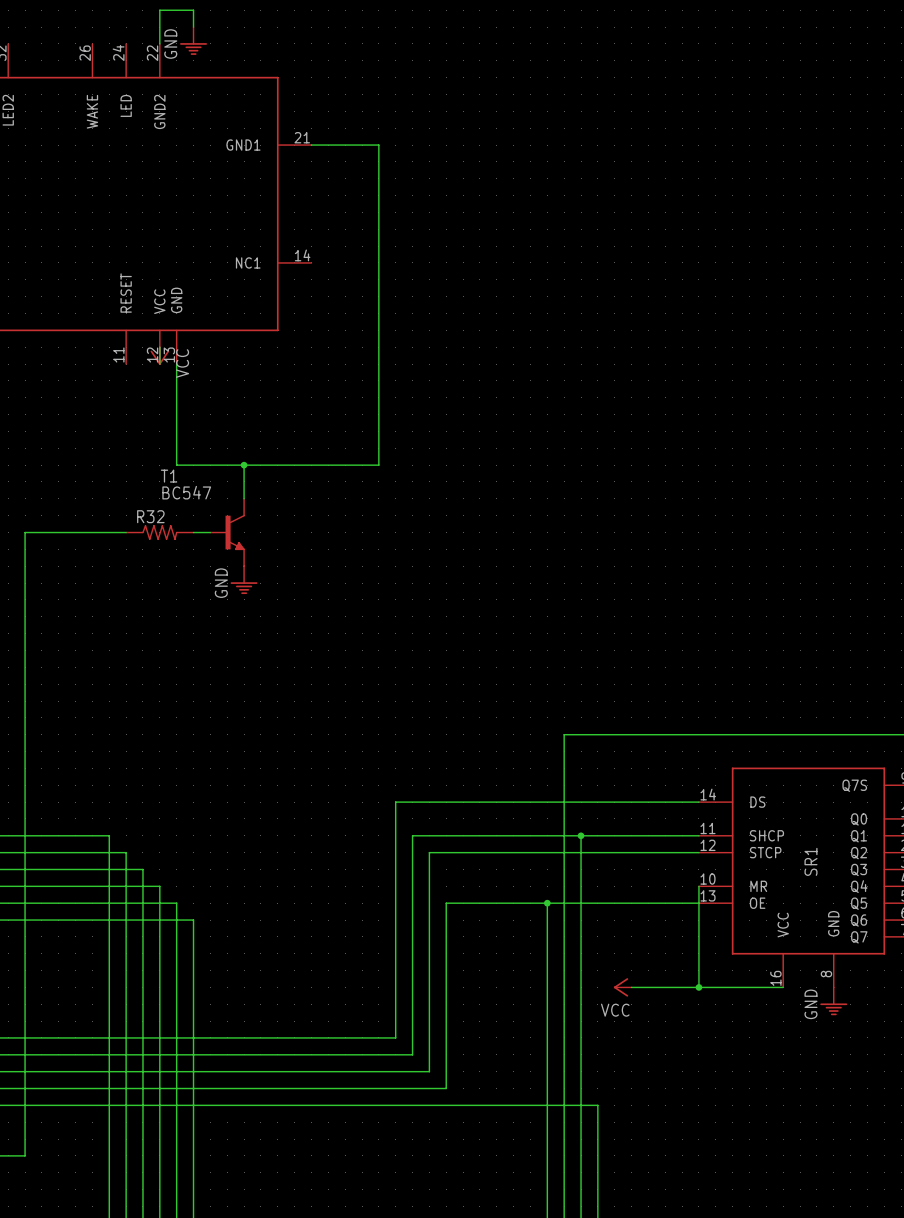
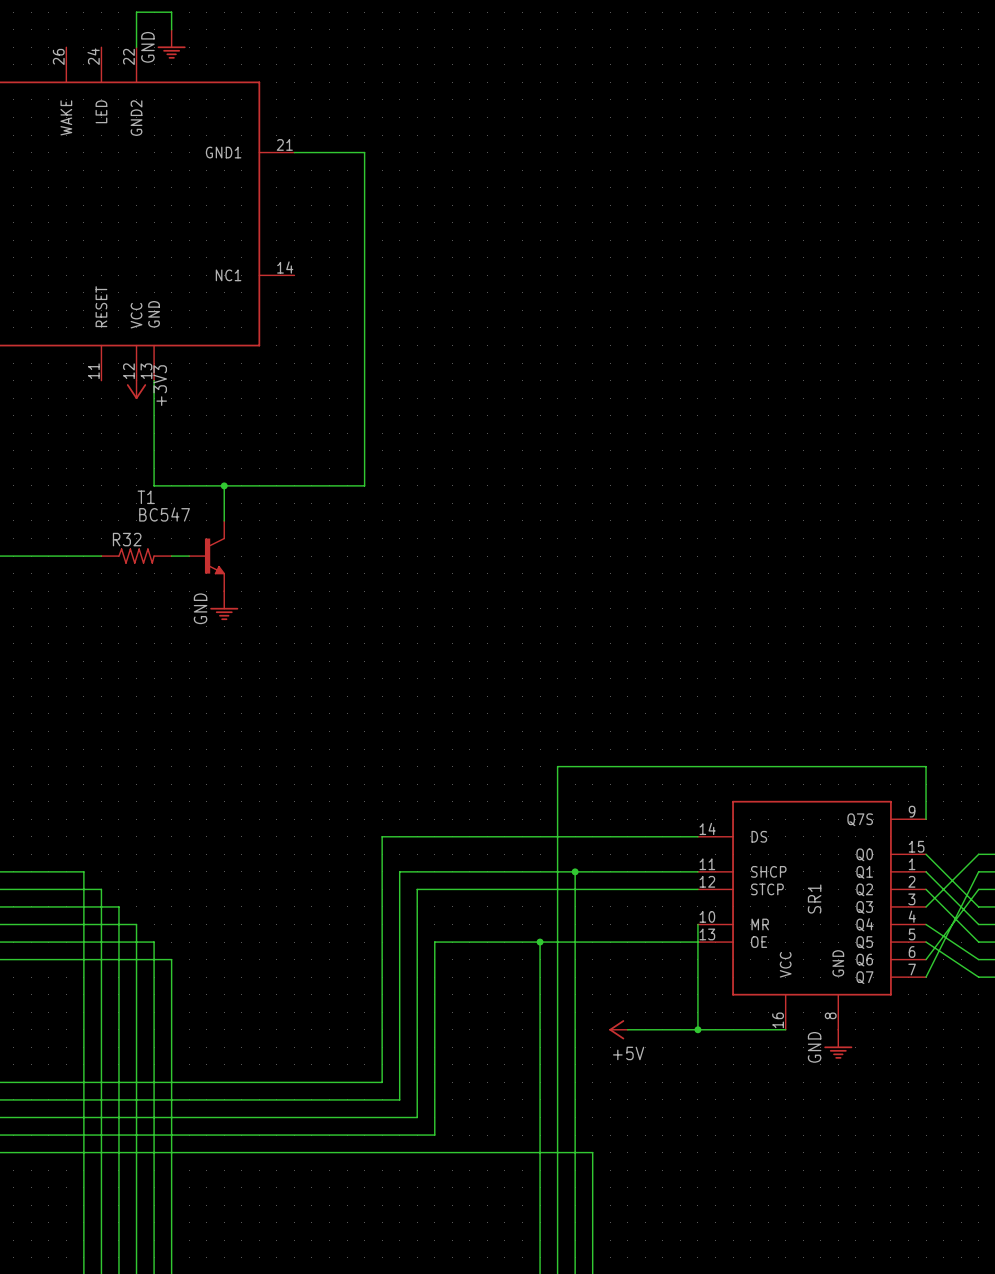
power symbol: VCC (159, 356) -> none
power symbol: none -> +3V3 (136, 389)
power symbol: VCC (622, 987) -> +5V (618, 1029)

